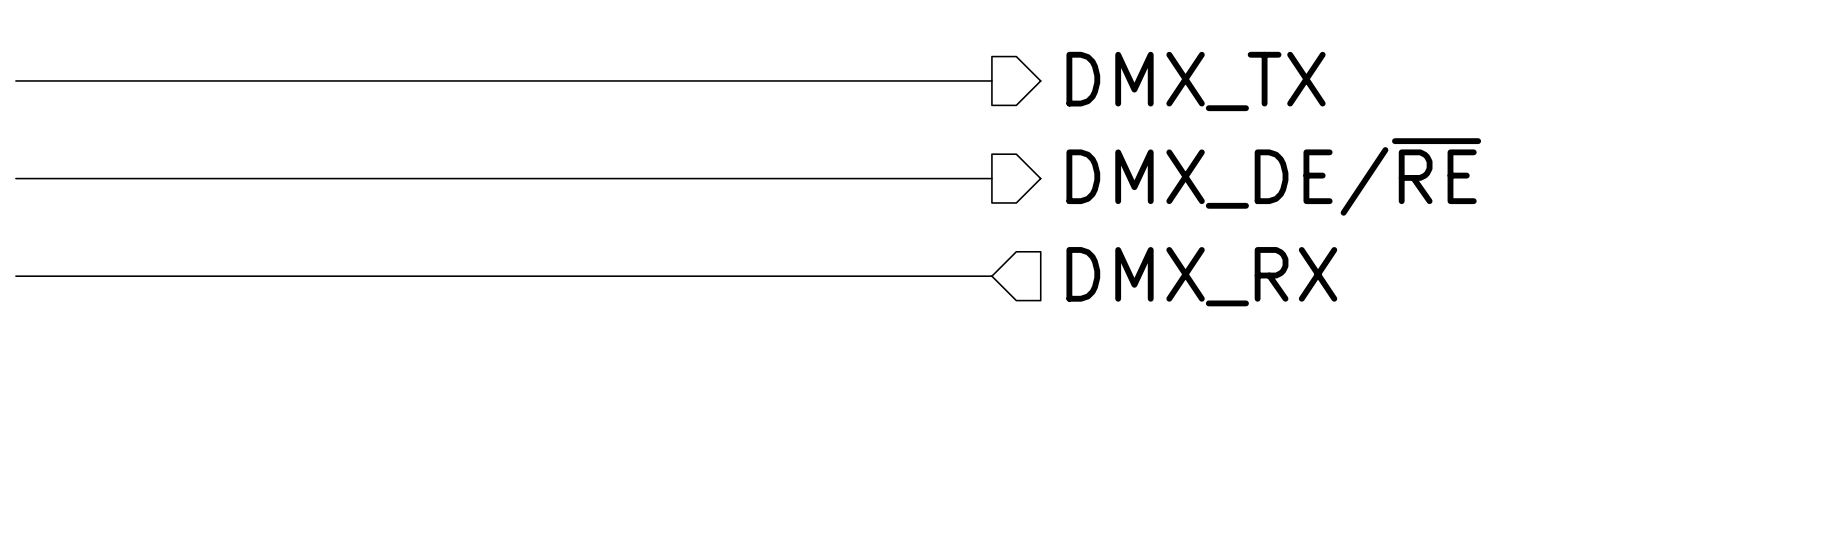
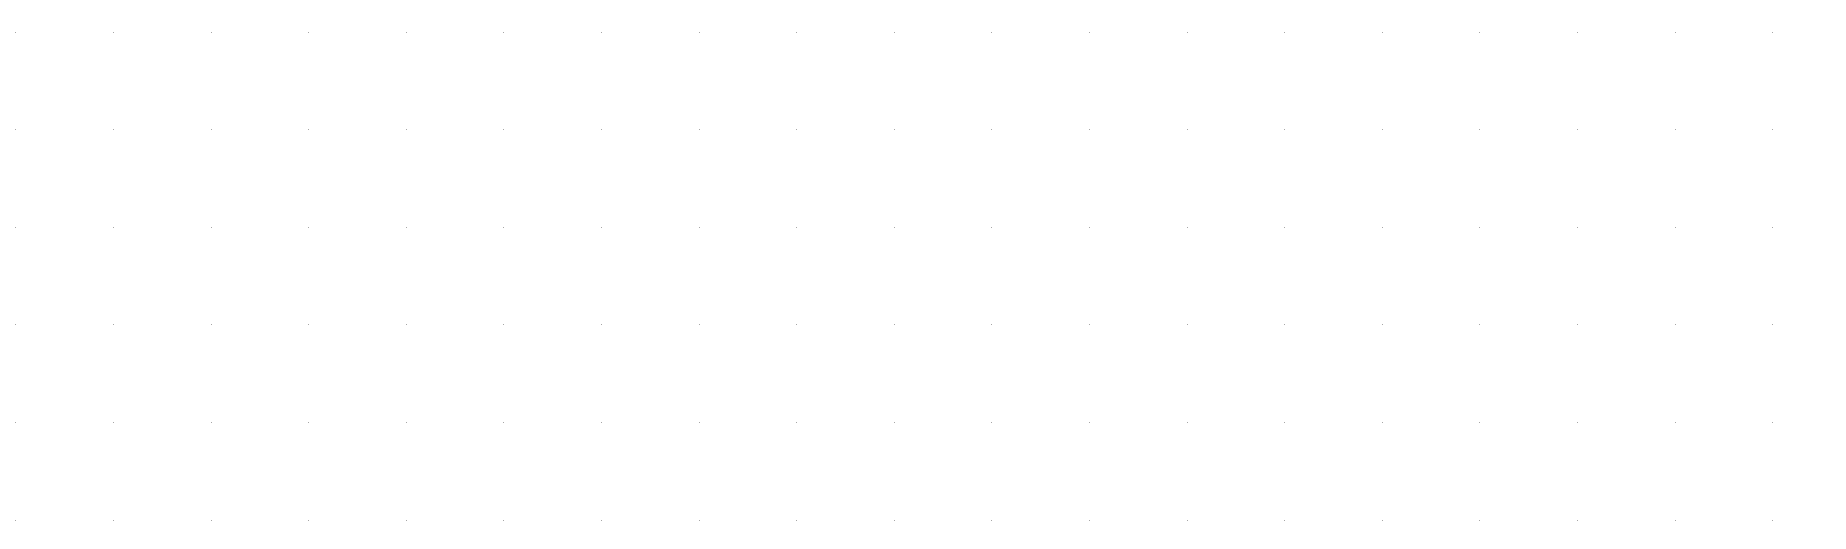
wire: (15, 80) (991, 80) -> none
hierarchical label: DMX_TX (1196, 81) -> none
hierarchical label: DMX_DE/~{RE} (1273, 176) -> none
wire: (15, 178) (991, 178) -> none
wire: (15, 276) (991, 276) -> none
hierarchical label: DMX_RX (1201, 276) -> none

